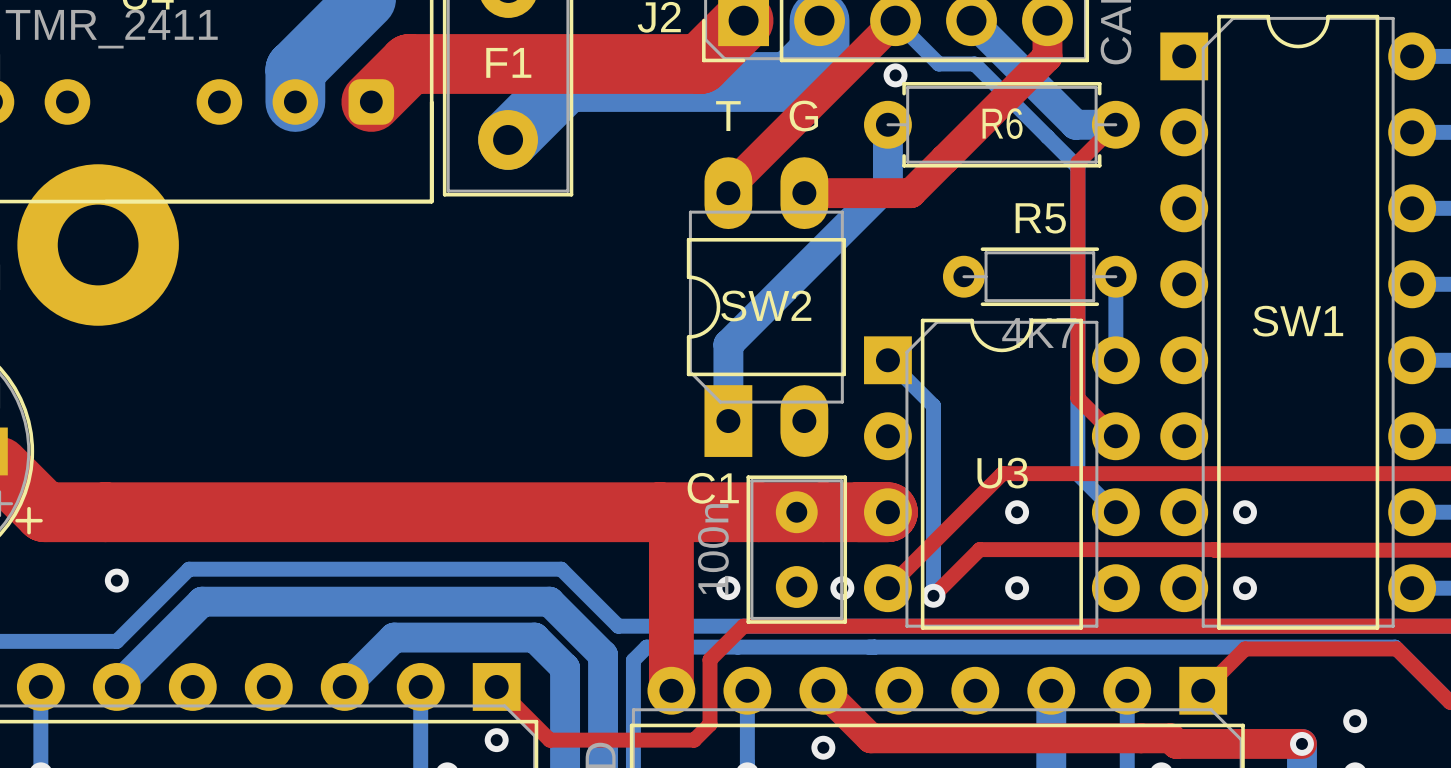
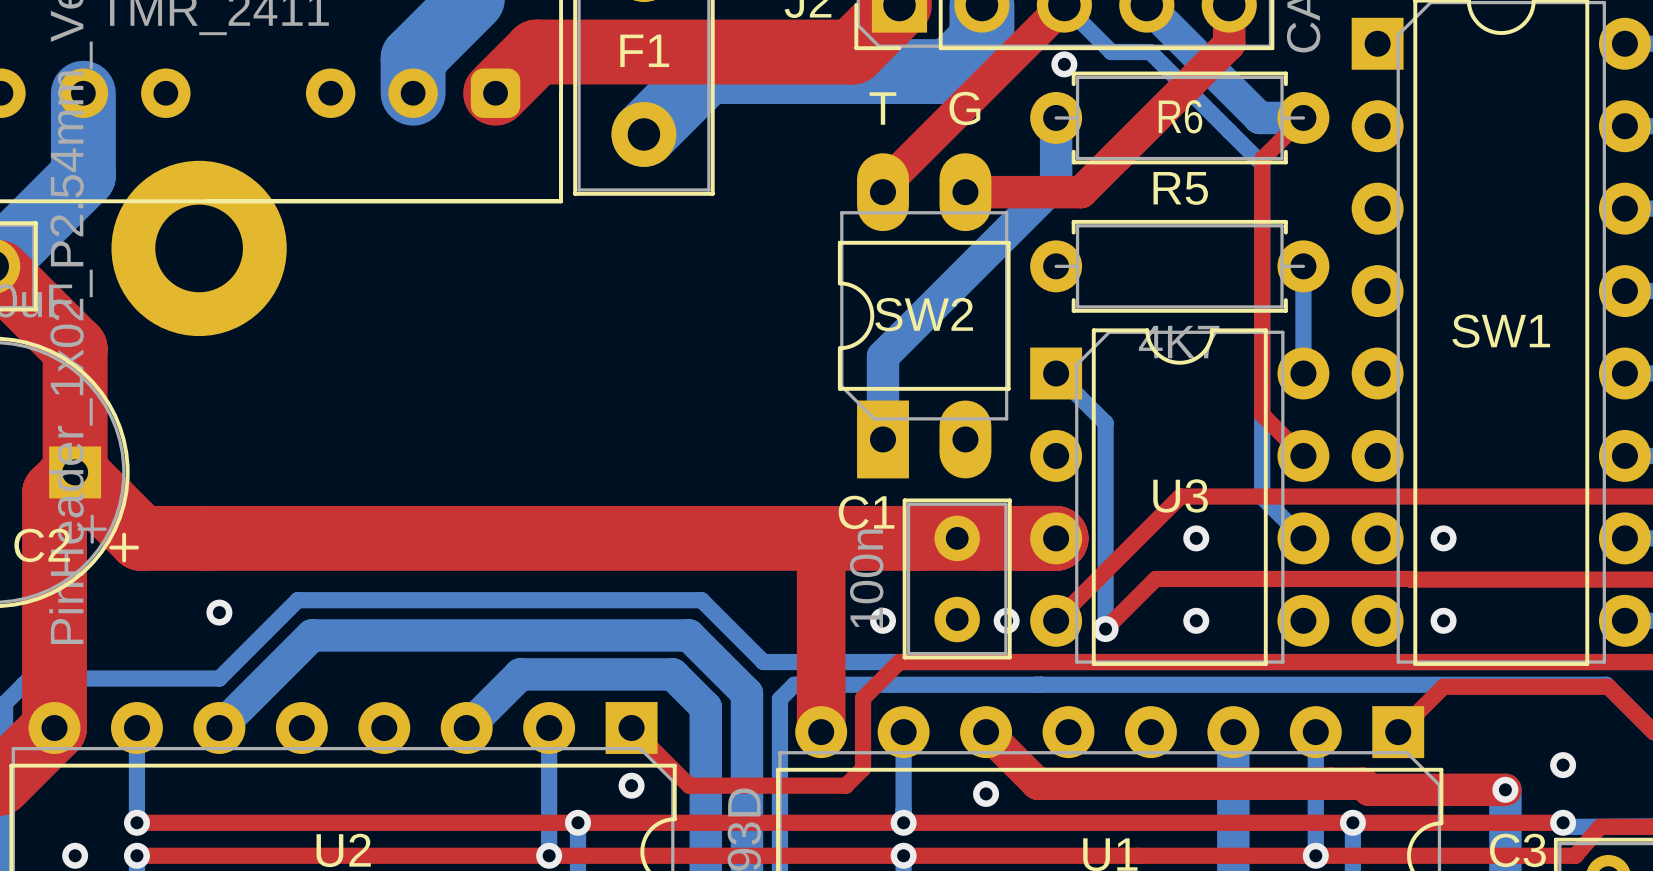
R5 footprint: [942, 247, 1137, 307] -> [1030, 219, 1330, 313]

